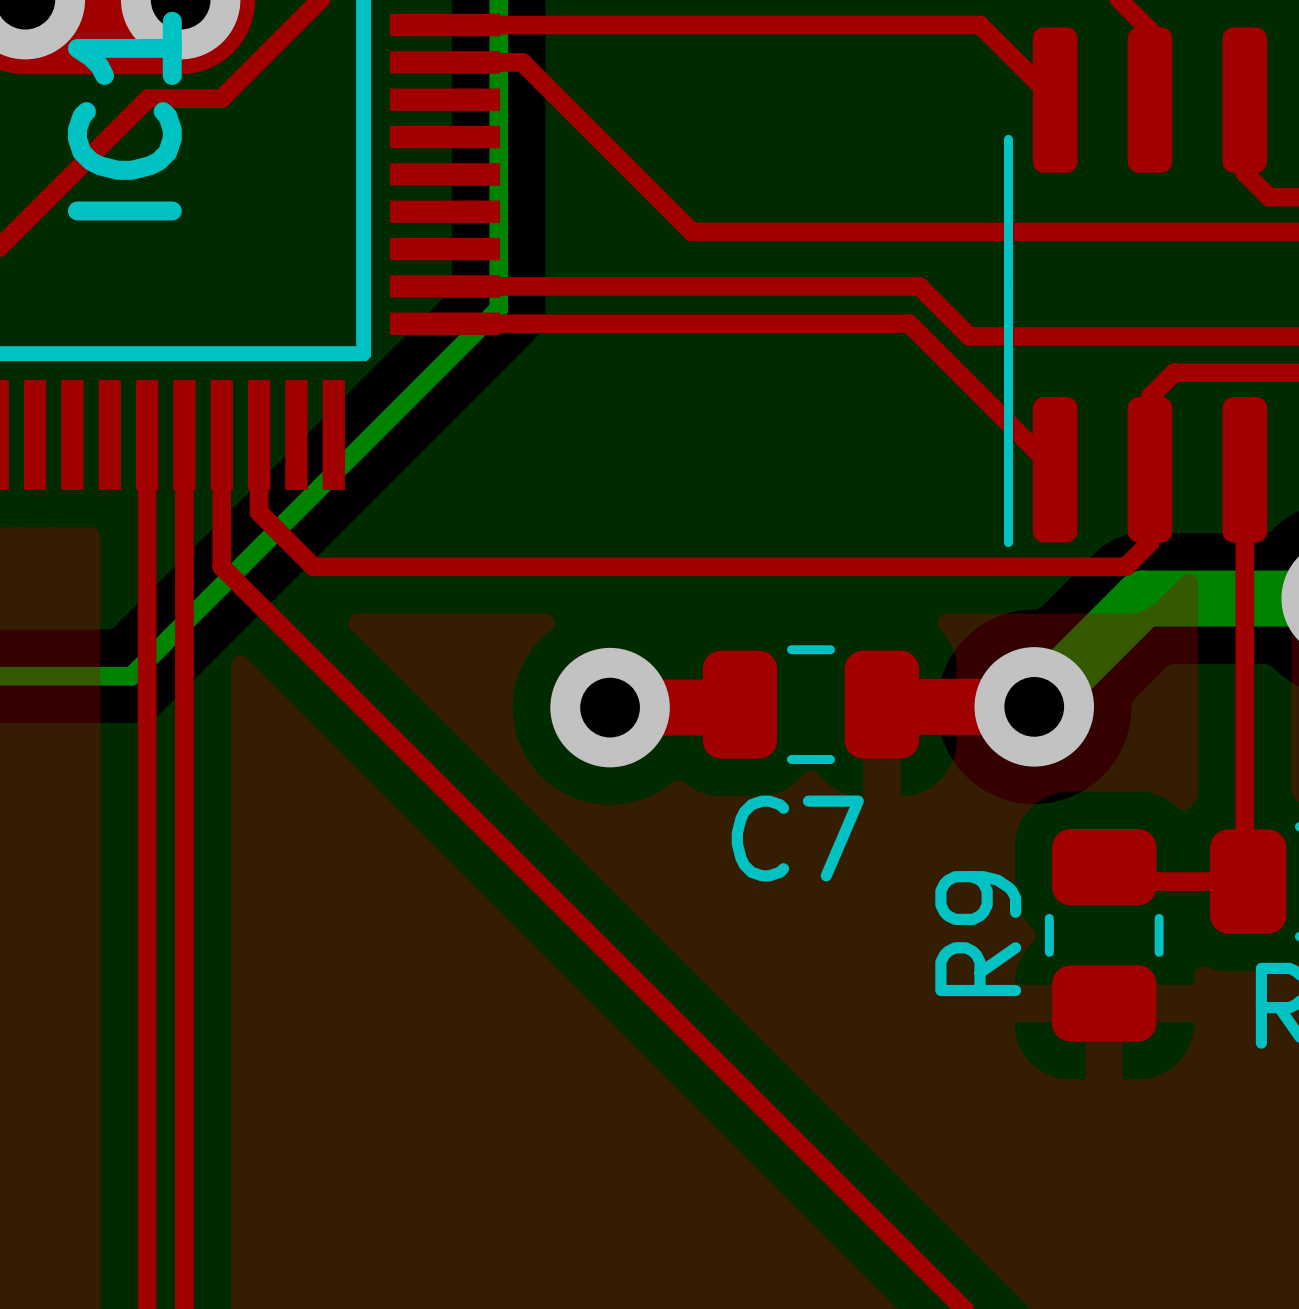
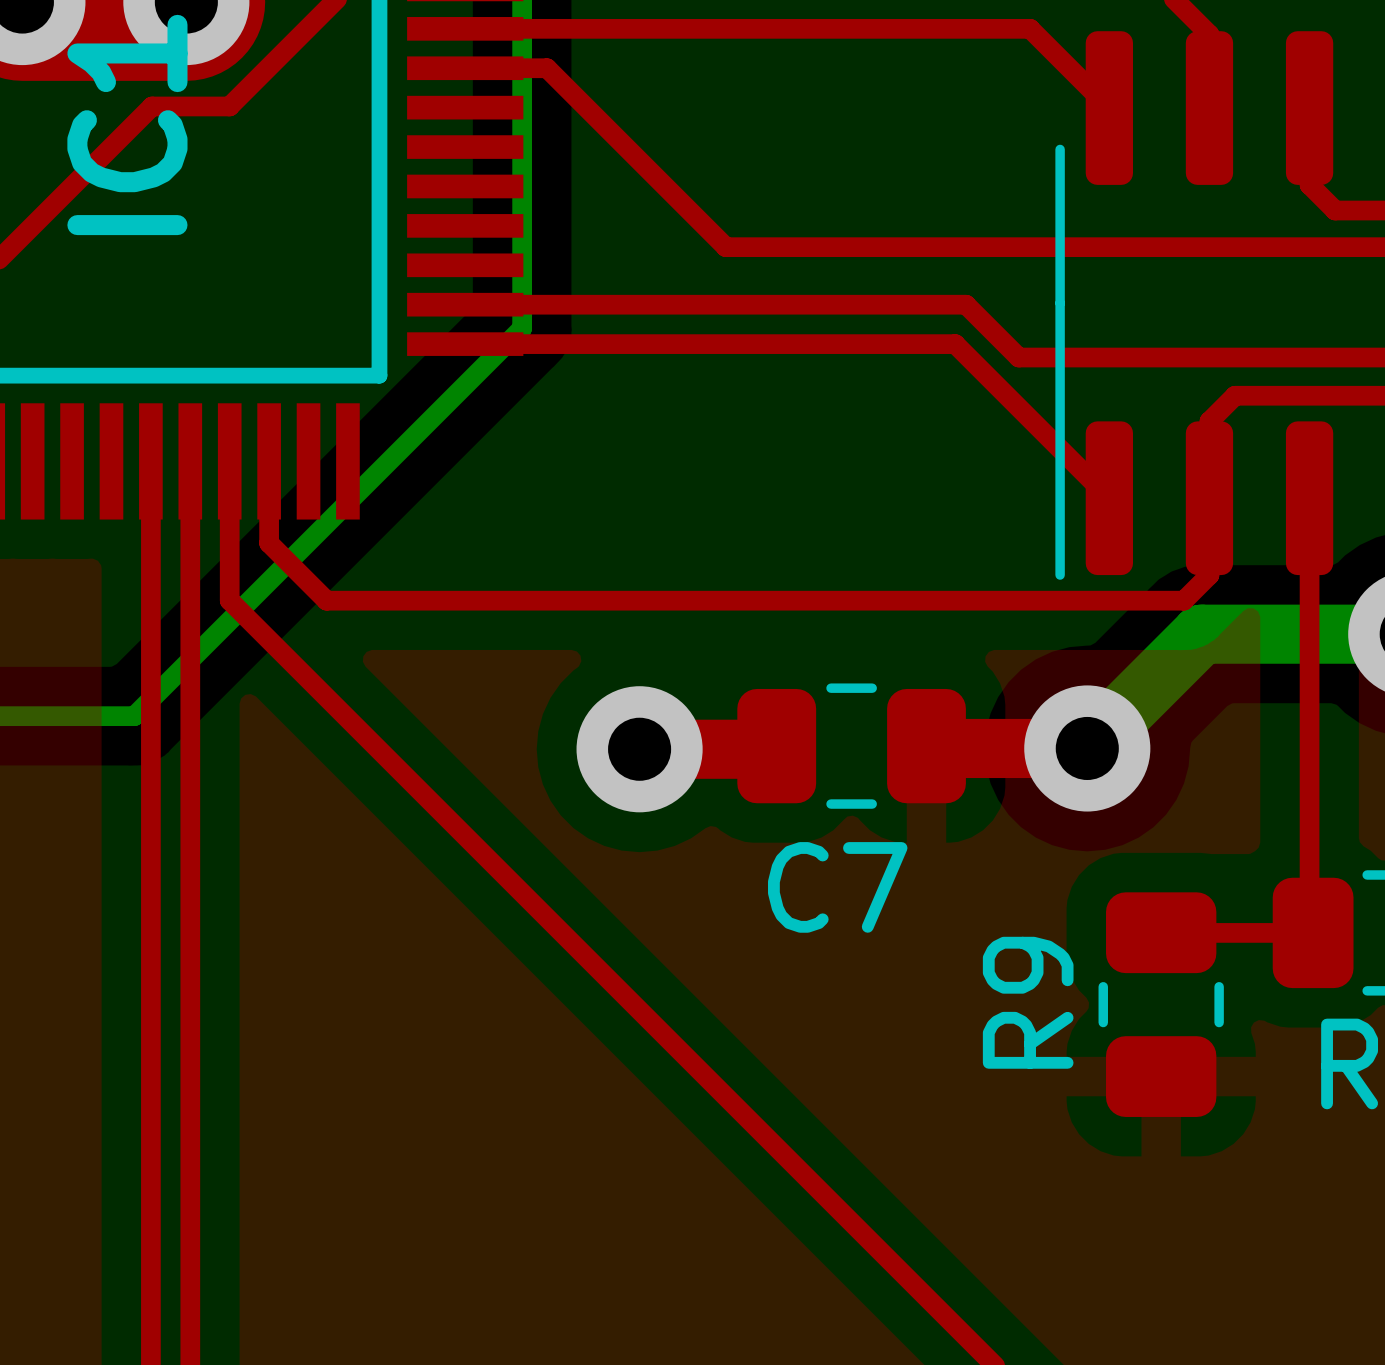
R9 position: (1104, 935) -> (1161, 1004)

